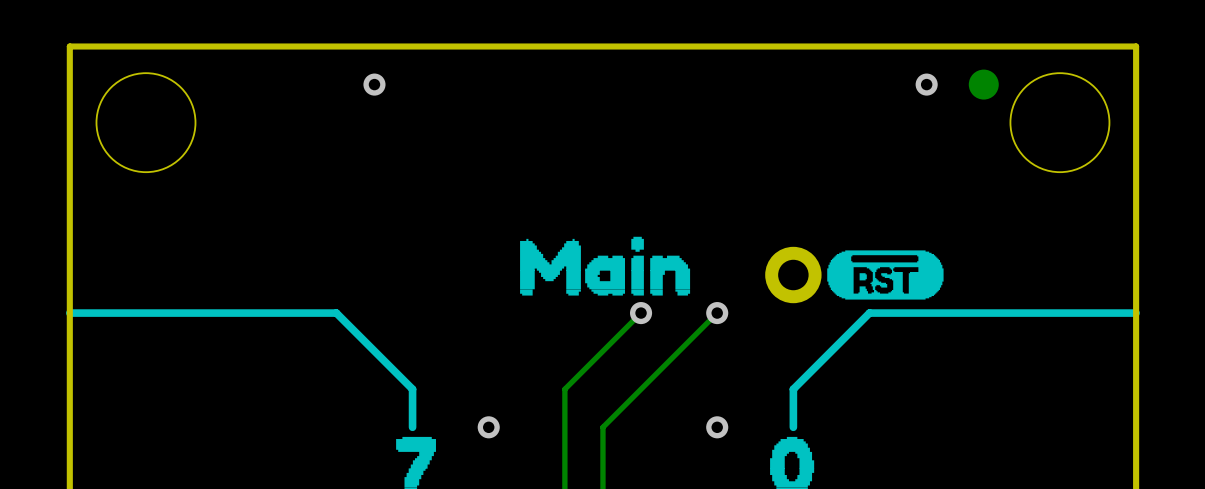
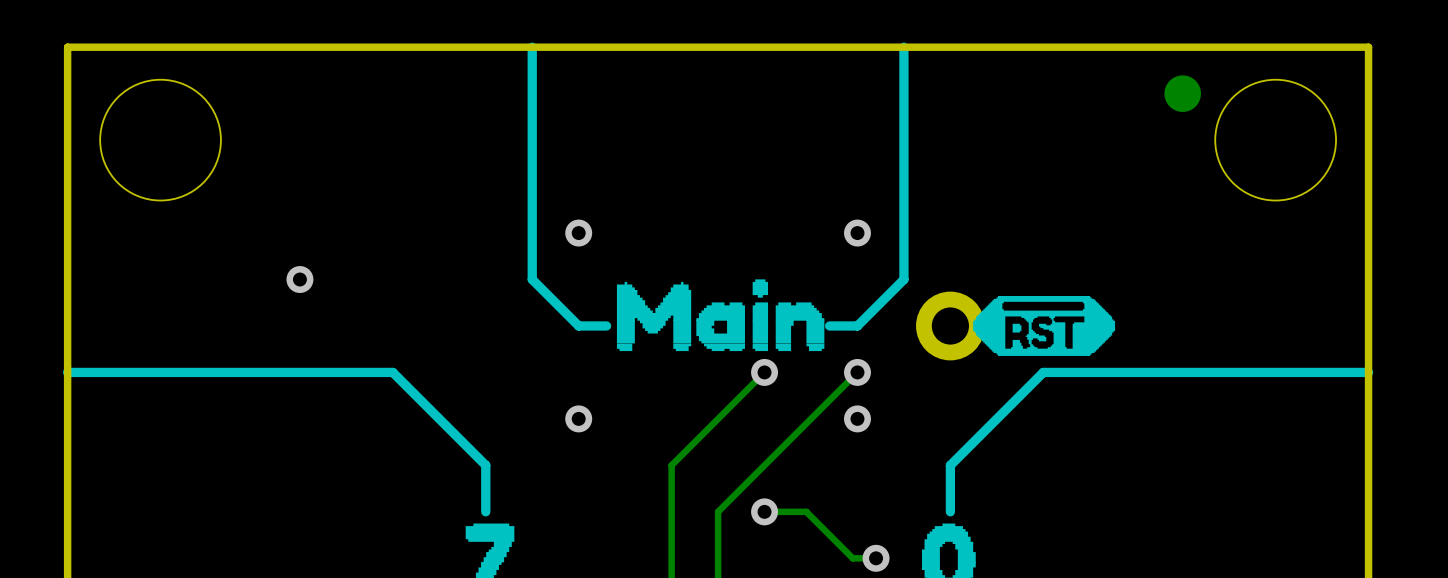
line: none -> (532, 47) (532, 279) (578, 325) (606, 325)
line: none -> (903, 47) (903, 279) (857, 325) (829, 325)
via: (374, 84) -> none
via: (926, 84) -> none
via: none -> (578, 233)
via: none -> (857, 233)
via: none -> (299, 279)
drawing shape: [827, 250, 944, 300] -> [973, 295, 1116, 356]
via: none -> (578, 418)
via: none -> (857, 418)
via: (488, 427) -> none
track: none -> (764, 511) (806, 511) (852, 558) (876, 558)
via: none -> (764, 511)
via: (717, 427) -> none
via: none -> (876, 558)

